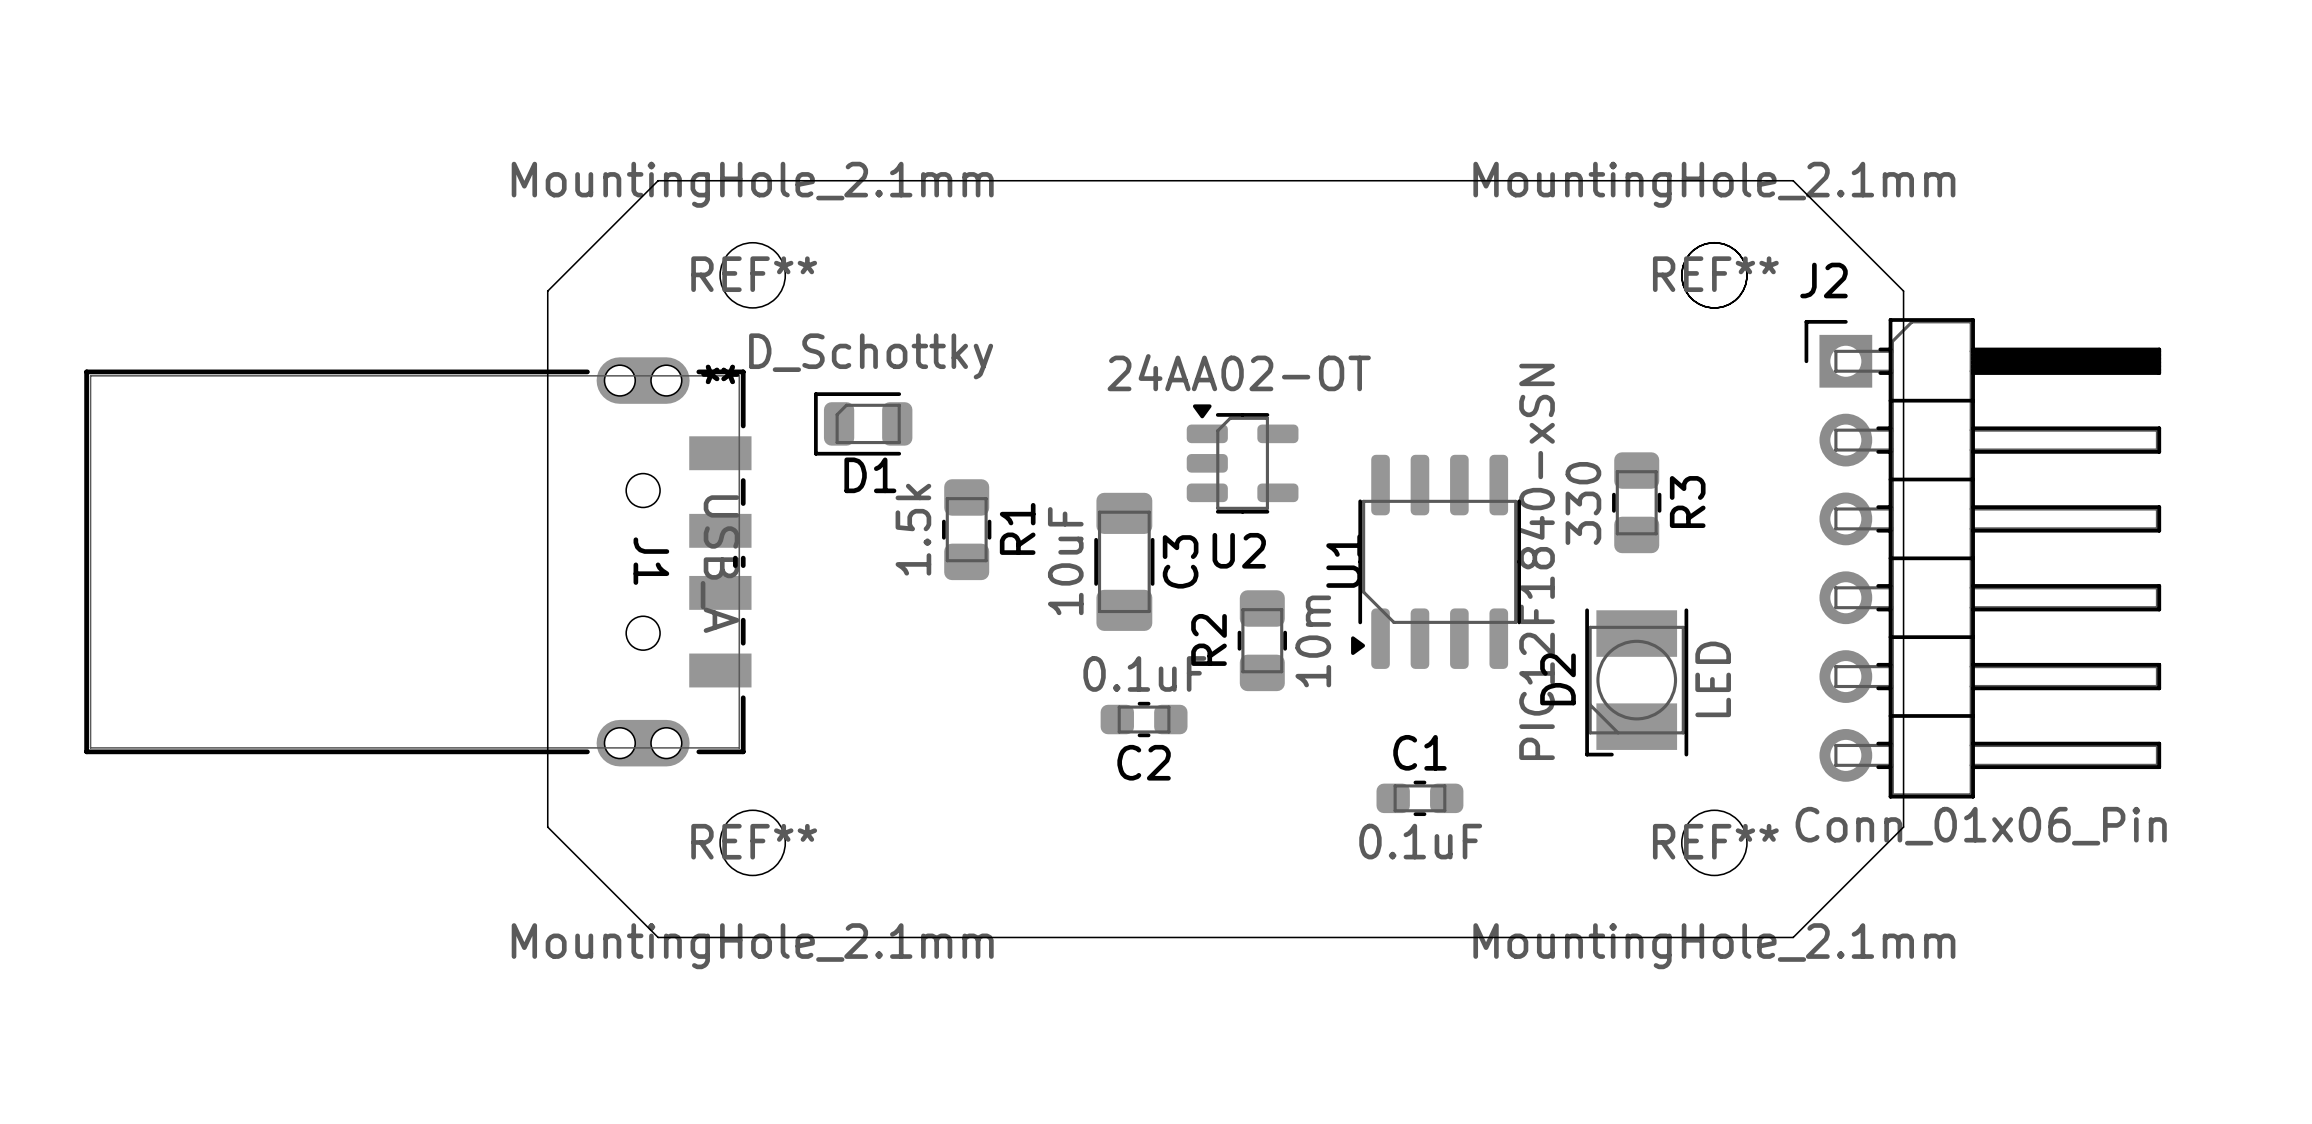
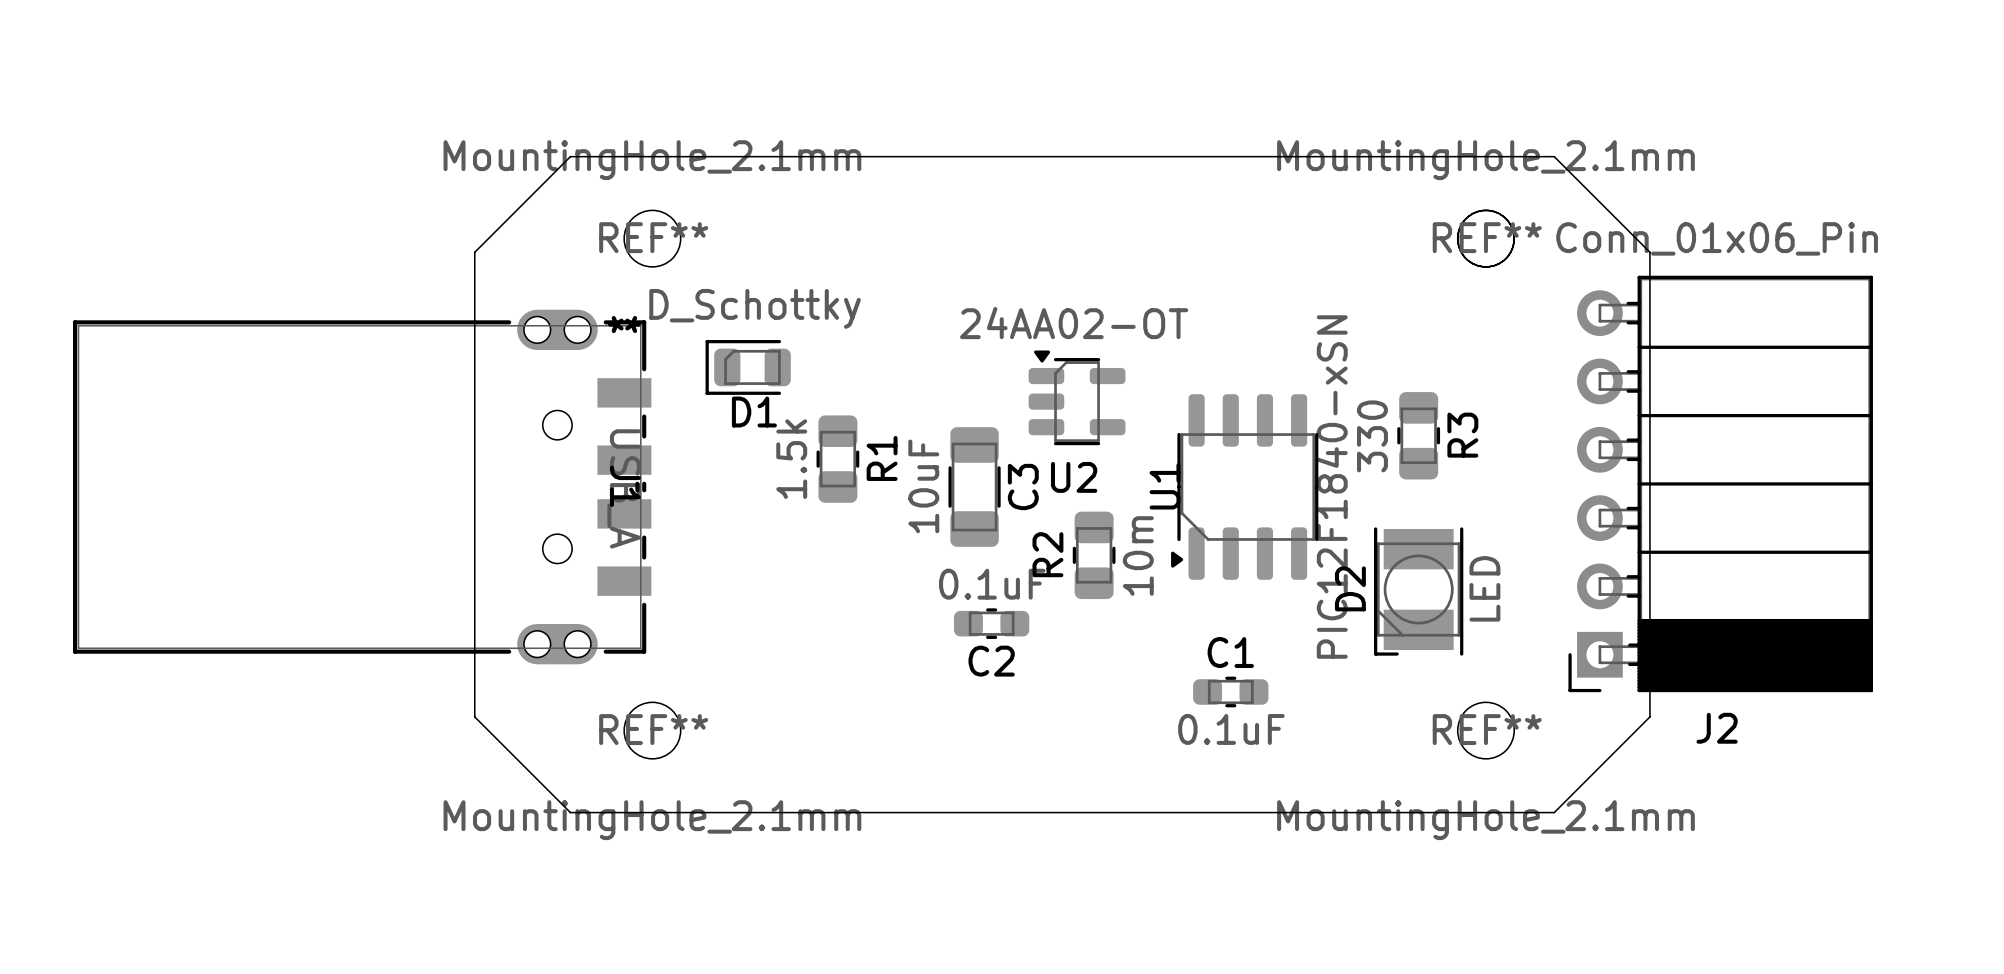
J2 name position: J2 (1823, 280) -> J2 (1717, 728)
J2 footprint: [1804, 318, 2162, 799] -> [1568, 275, 1873, 693]
J1 name position: J1 (651, 561) -> J1 (625, 486)
J2 value position: Conn_01x06_Pin (1981, 826) -> Conn_01x06_Pin (1717, 238)

